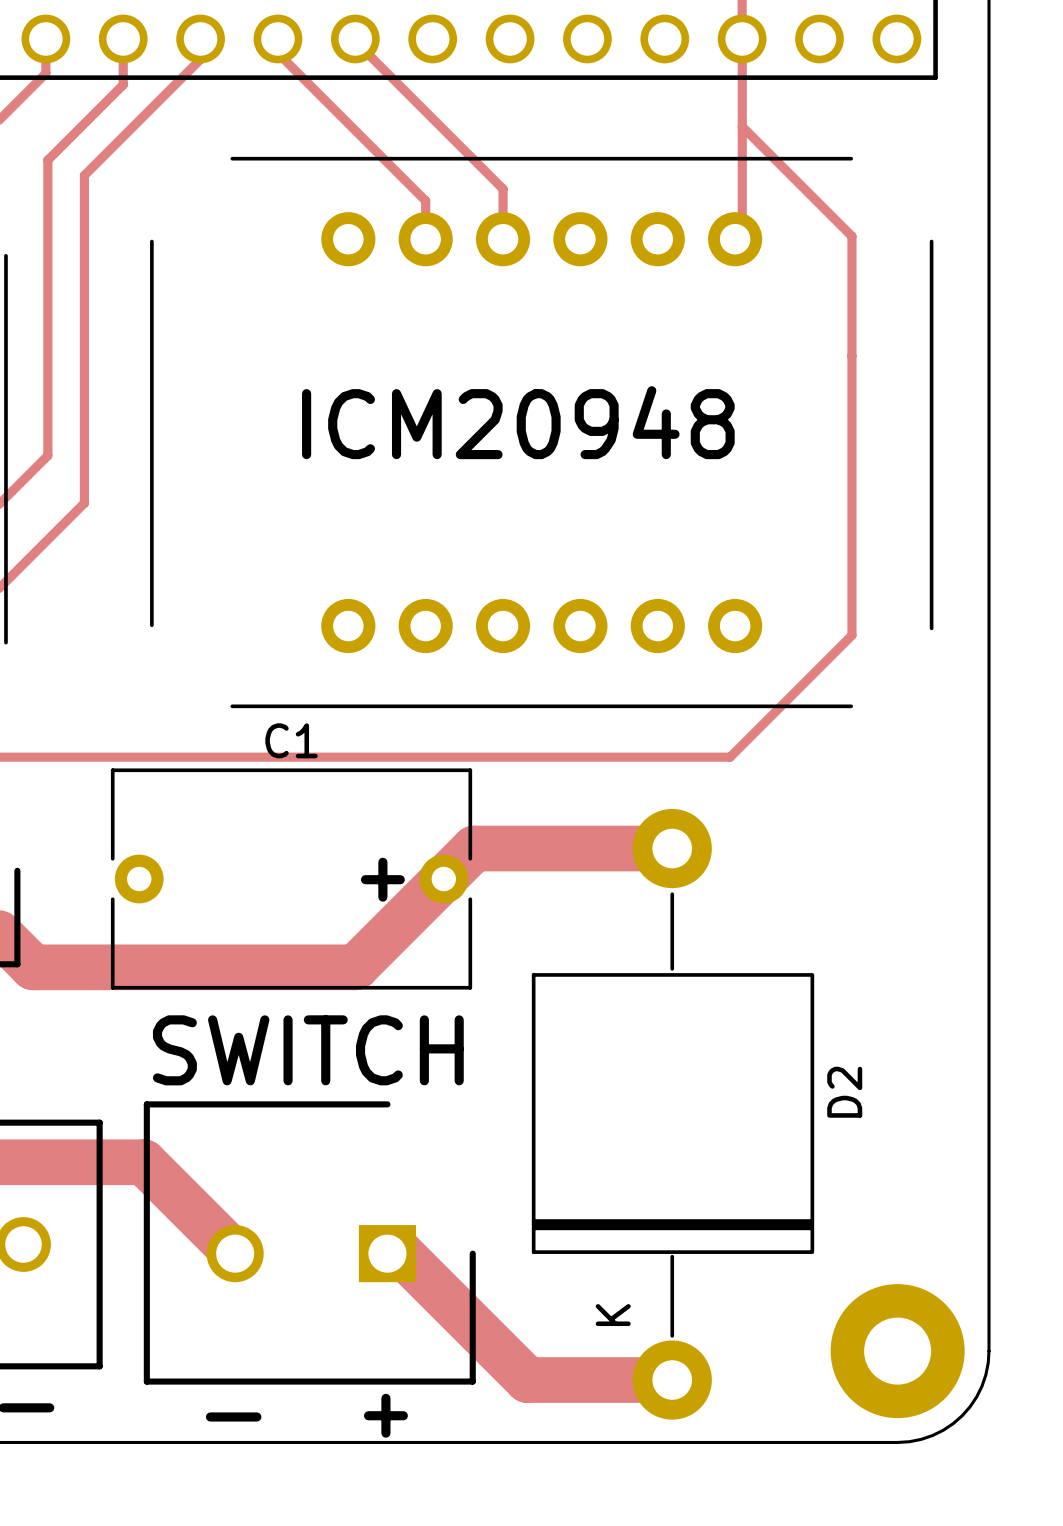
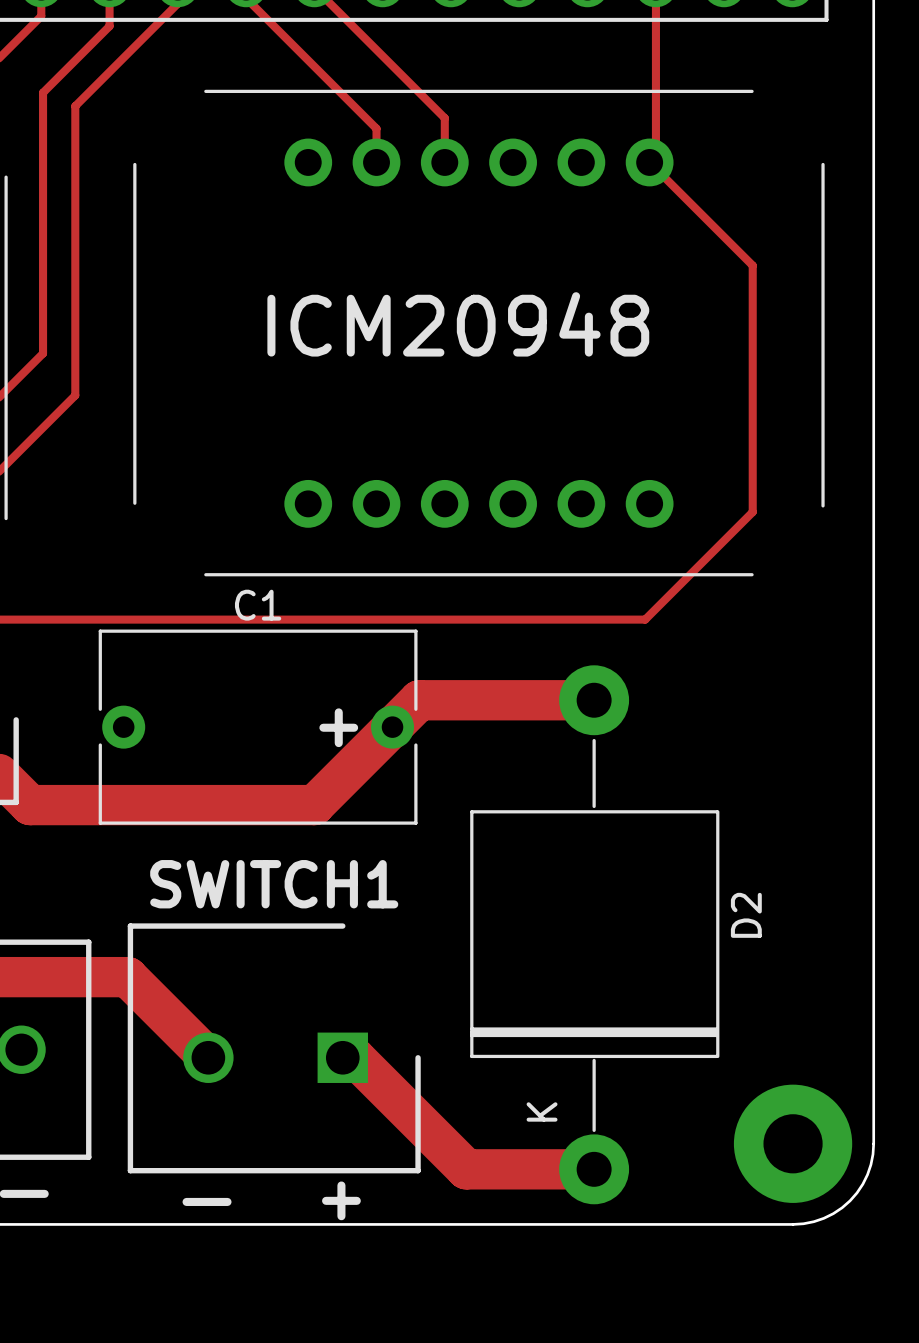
track: (742, 126) (851, 236) (851, 356) -> (649, 162) (752, 265)
text: SWITCH (308, 1050) -> none
SWITCH1 name: none -> SWITCH1 (274, 884)

